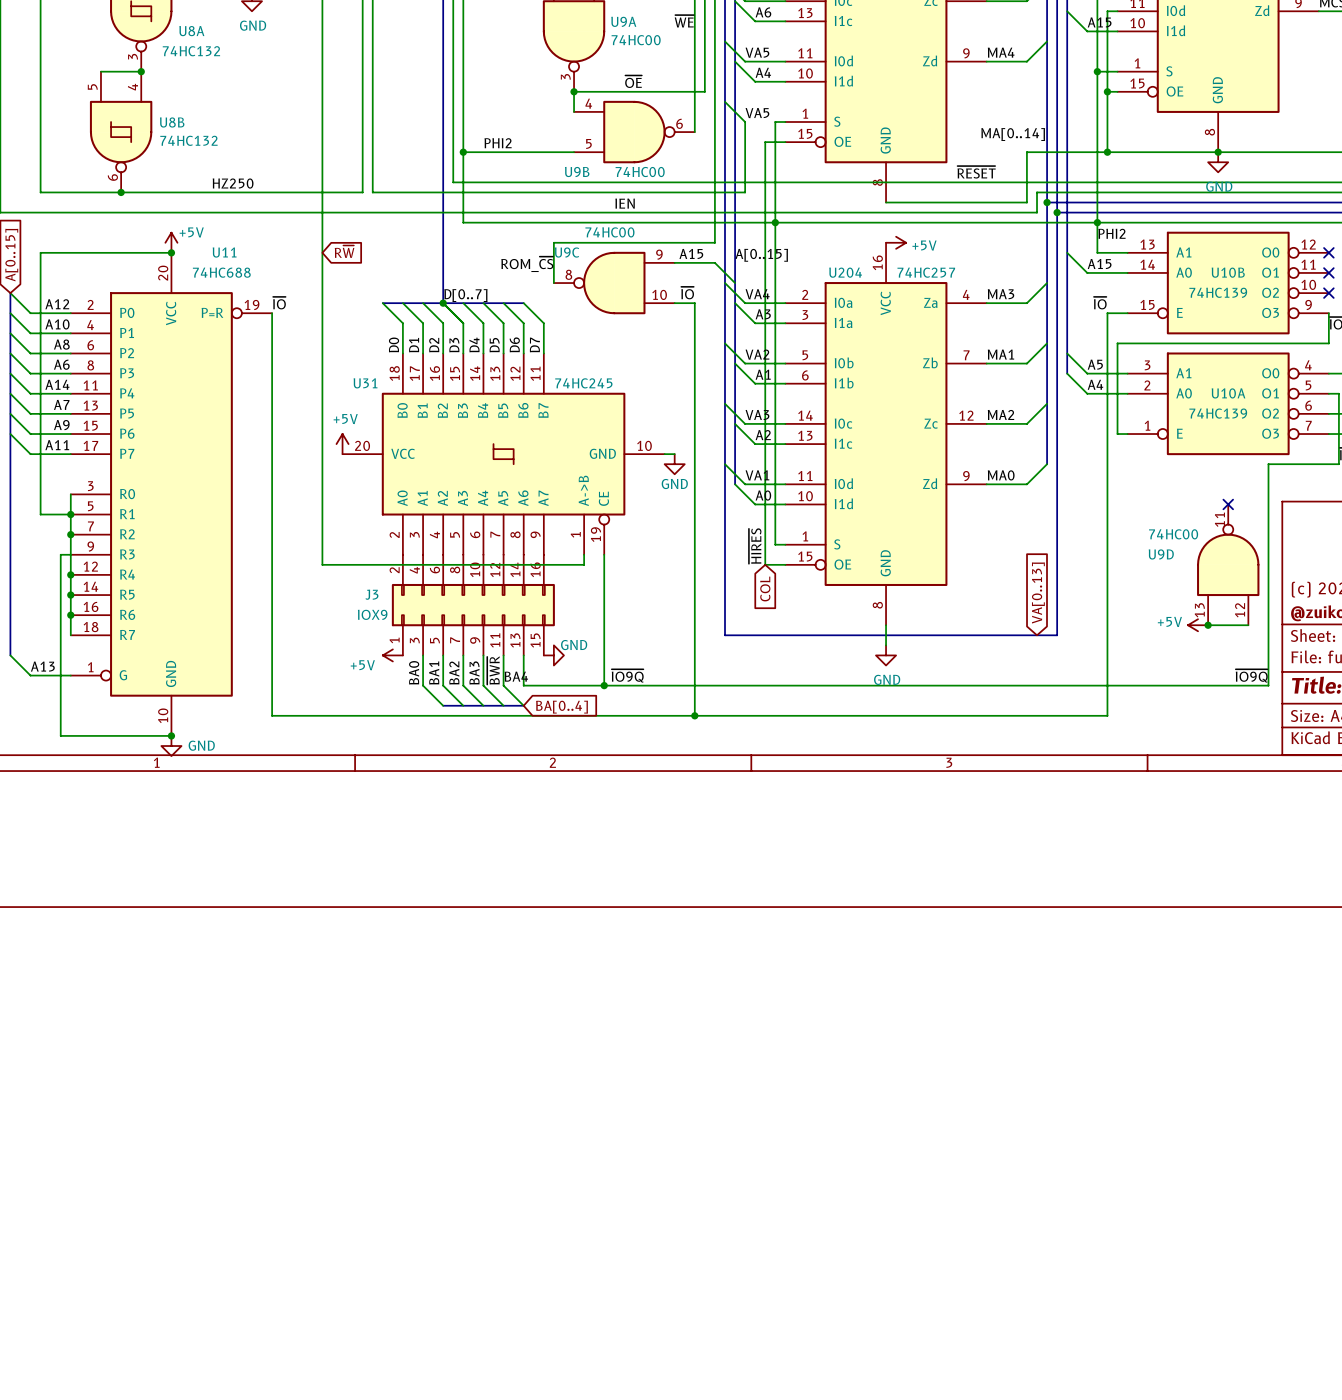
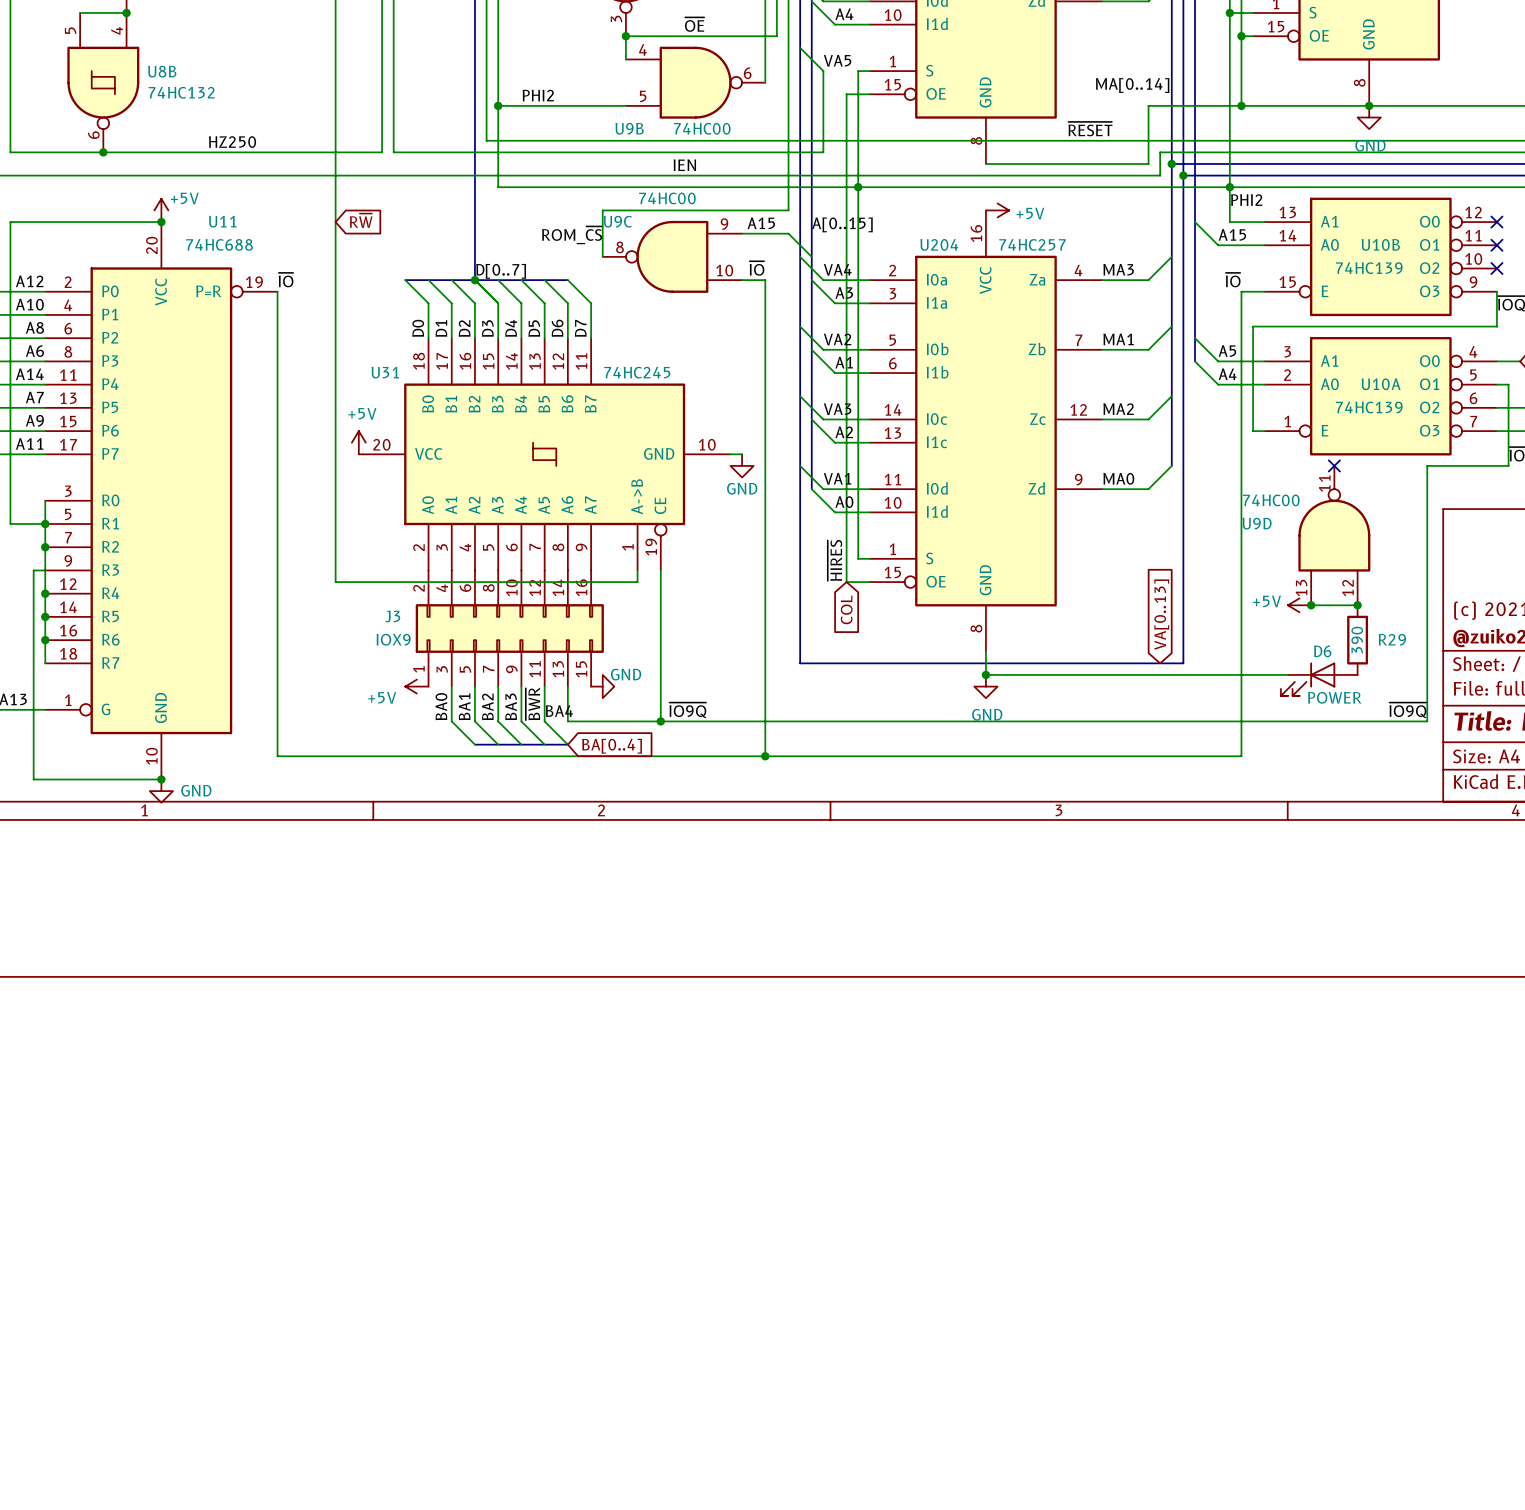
no-connect mark: none -> (1334, 465)
no-connect mark: (1228, 504) -> none
U9D position: (1228, 564) -> (1334, 535)
junction: none -> (1311, 605)
junction: none -> (1357, 605)
R29: none -> 390 (1357, 640)
power symbol position: +5V (1198, 625) -> +5V (1299, 605)
wire: (1208, 625) (1248, 625) -> (1311, 605) (1357, 605)
junction: (1208, 625) -> none
wire: none -> (985, 674) (1287, 674)
junction: none -> (985, 674)
D6: none -> POWER (1319, 679)

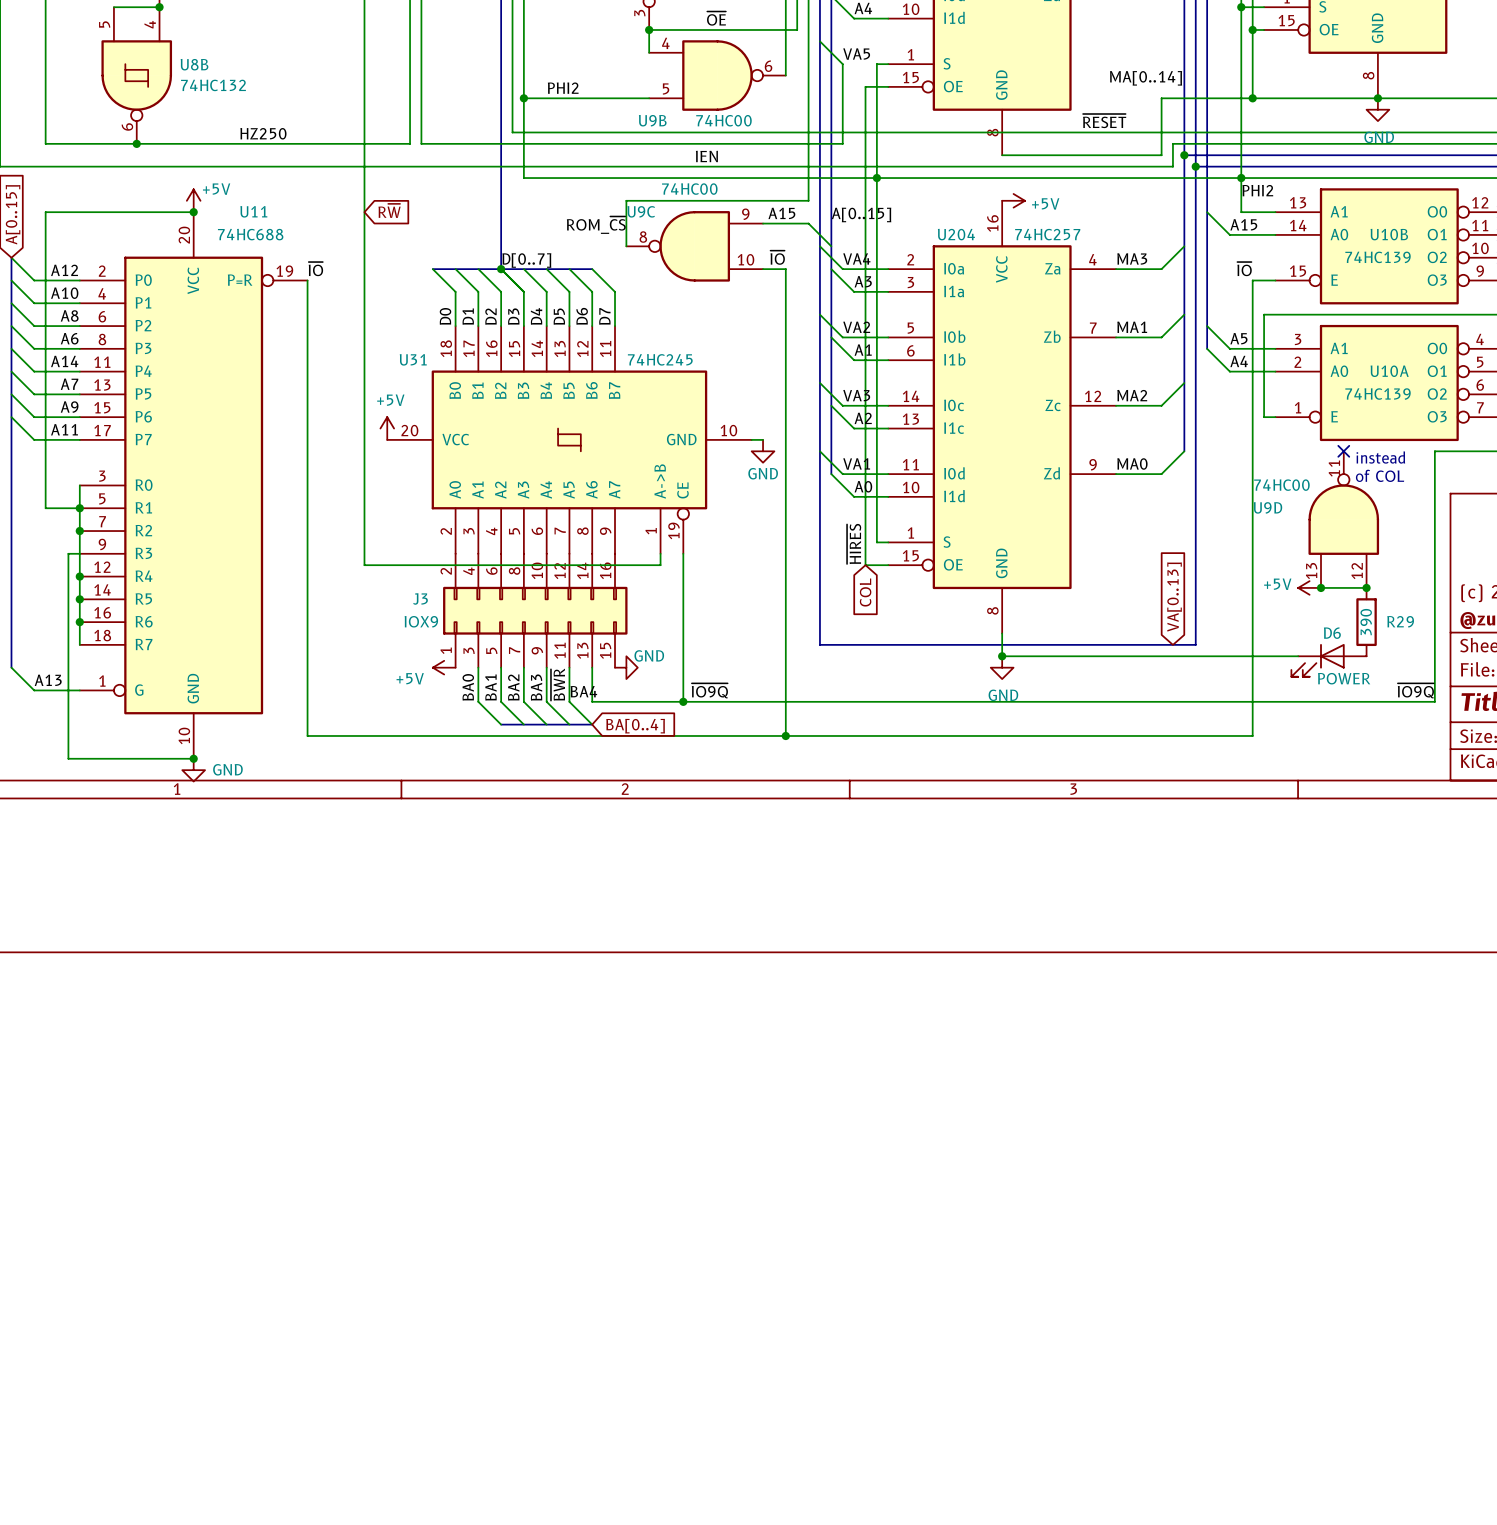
text: none -> instead (1380, 457)
text: none -> of COL (1380, 475)

